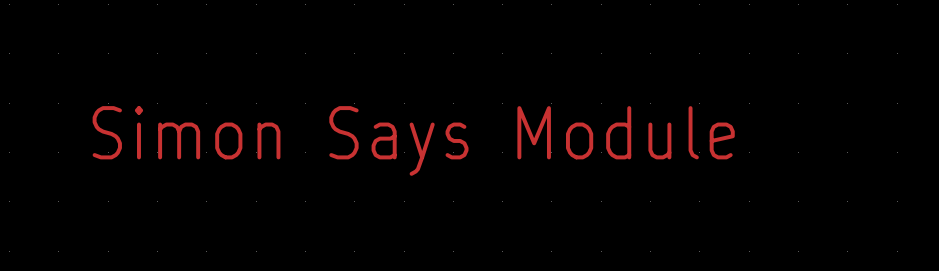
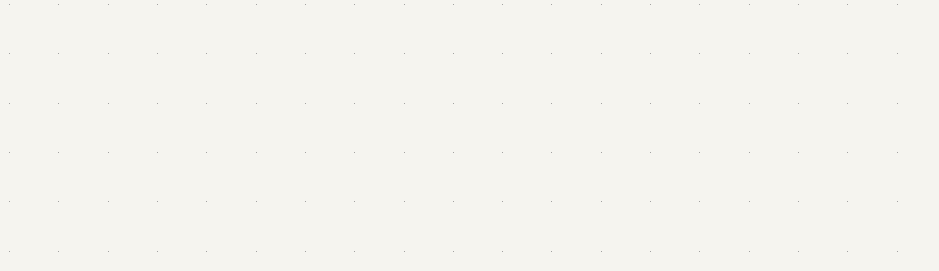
text: Simon Says Module (413, 140) -> none

